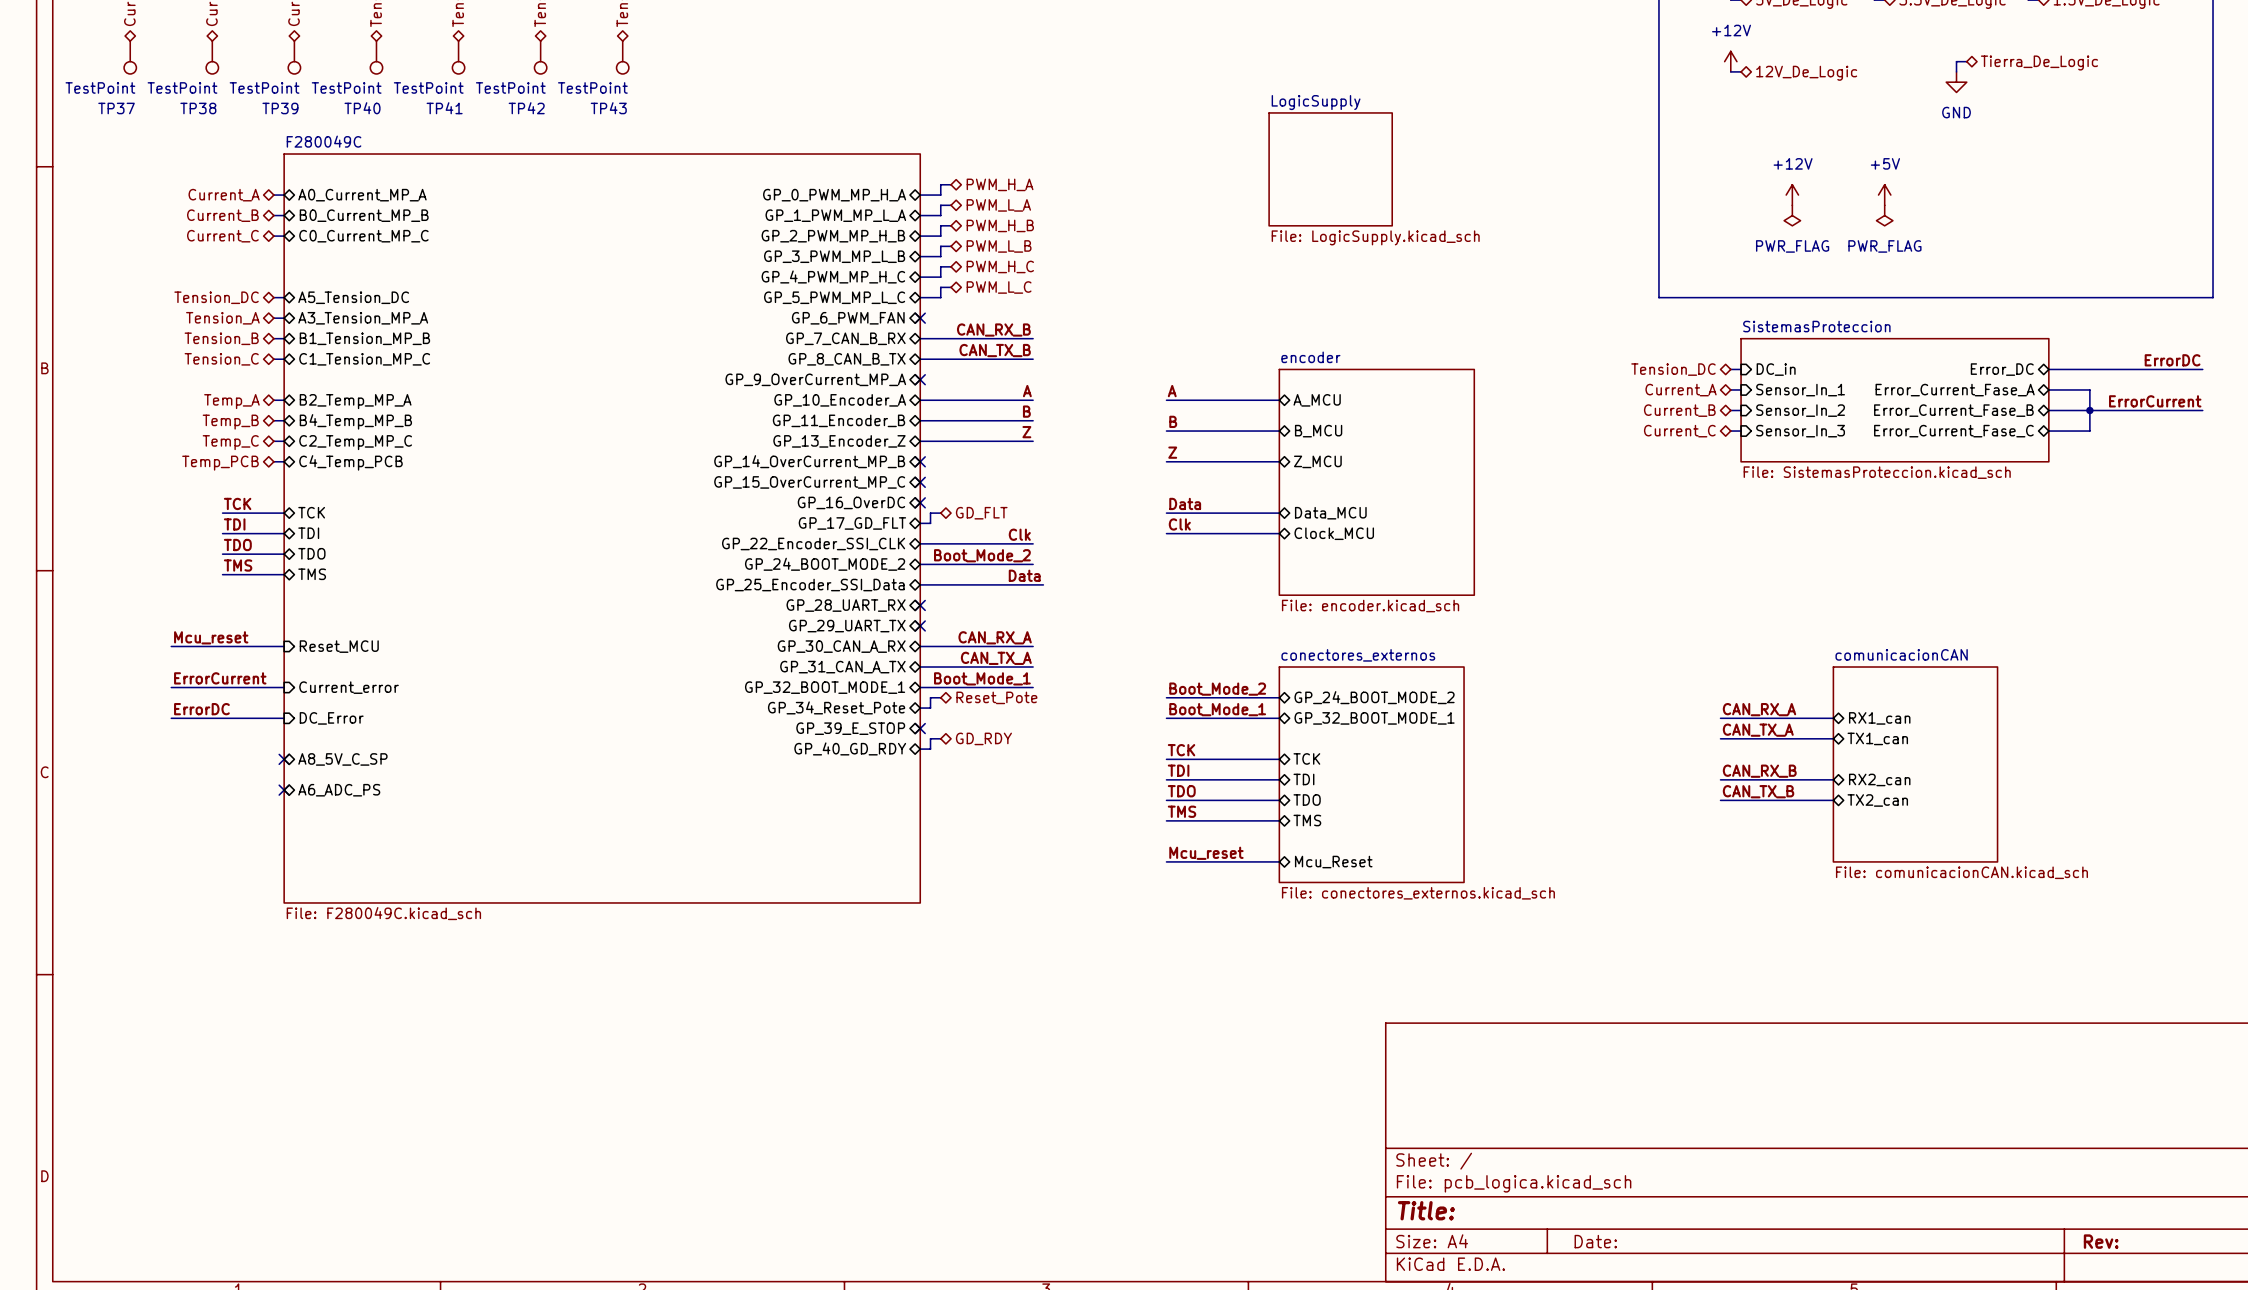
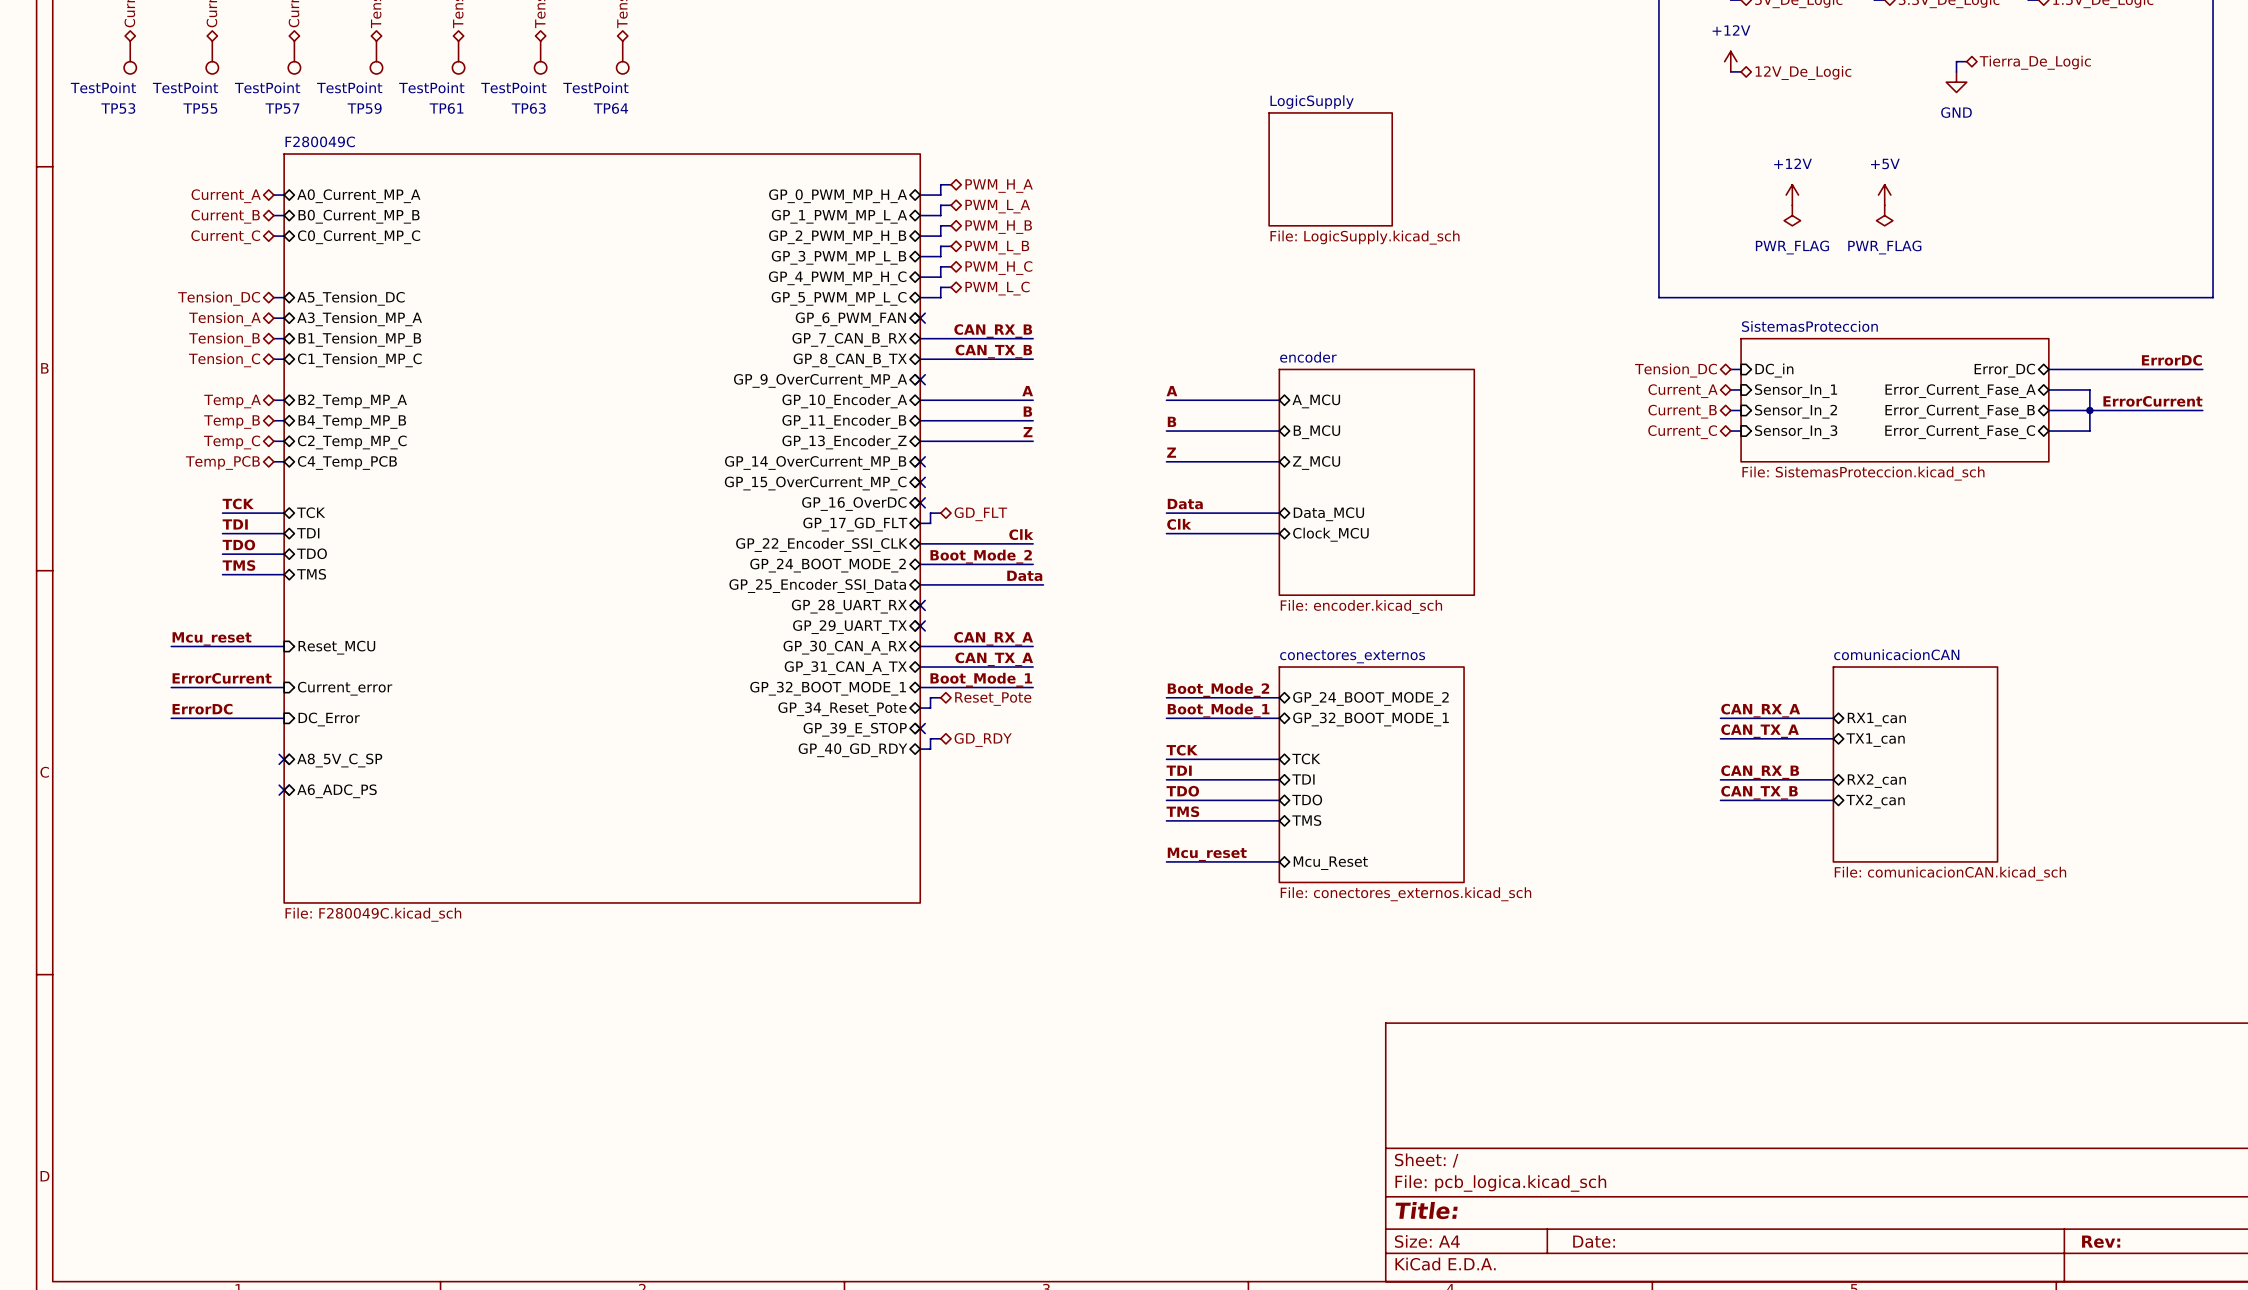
TP37 name: TP37 (116, 108) -> TP53 (118, 108)
TP38 name: TP38 (198, 108) -> TP55 (200, 108)
TP39 name: TP39 (280, 108) -> TP57 (282, 108)
TP40 name: TP40 (362, 108) -> TP59 (364, 108)
TP41 name: TP41 (444, 108) -> TP61 (446, 108)
TP42 name: TP42 (526, 108) -> TP63 (528, 108)
TP43 name: TP43 (608, 108) -> TP64 (610, 108)

